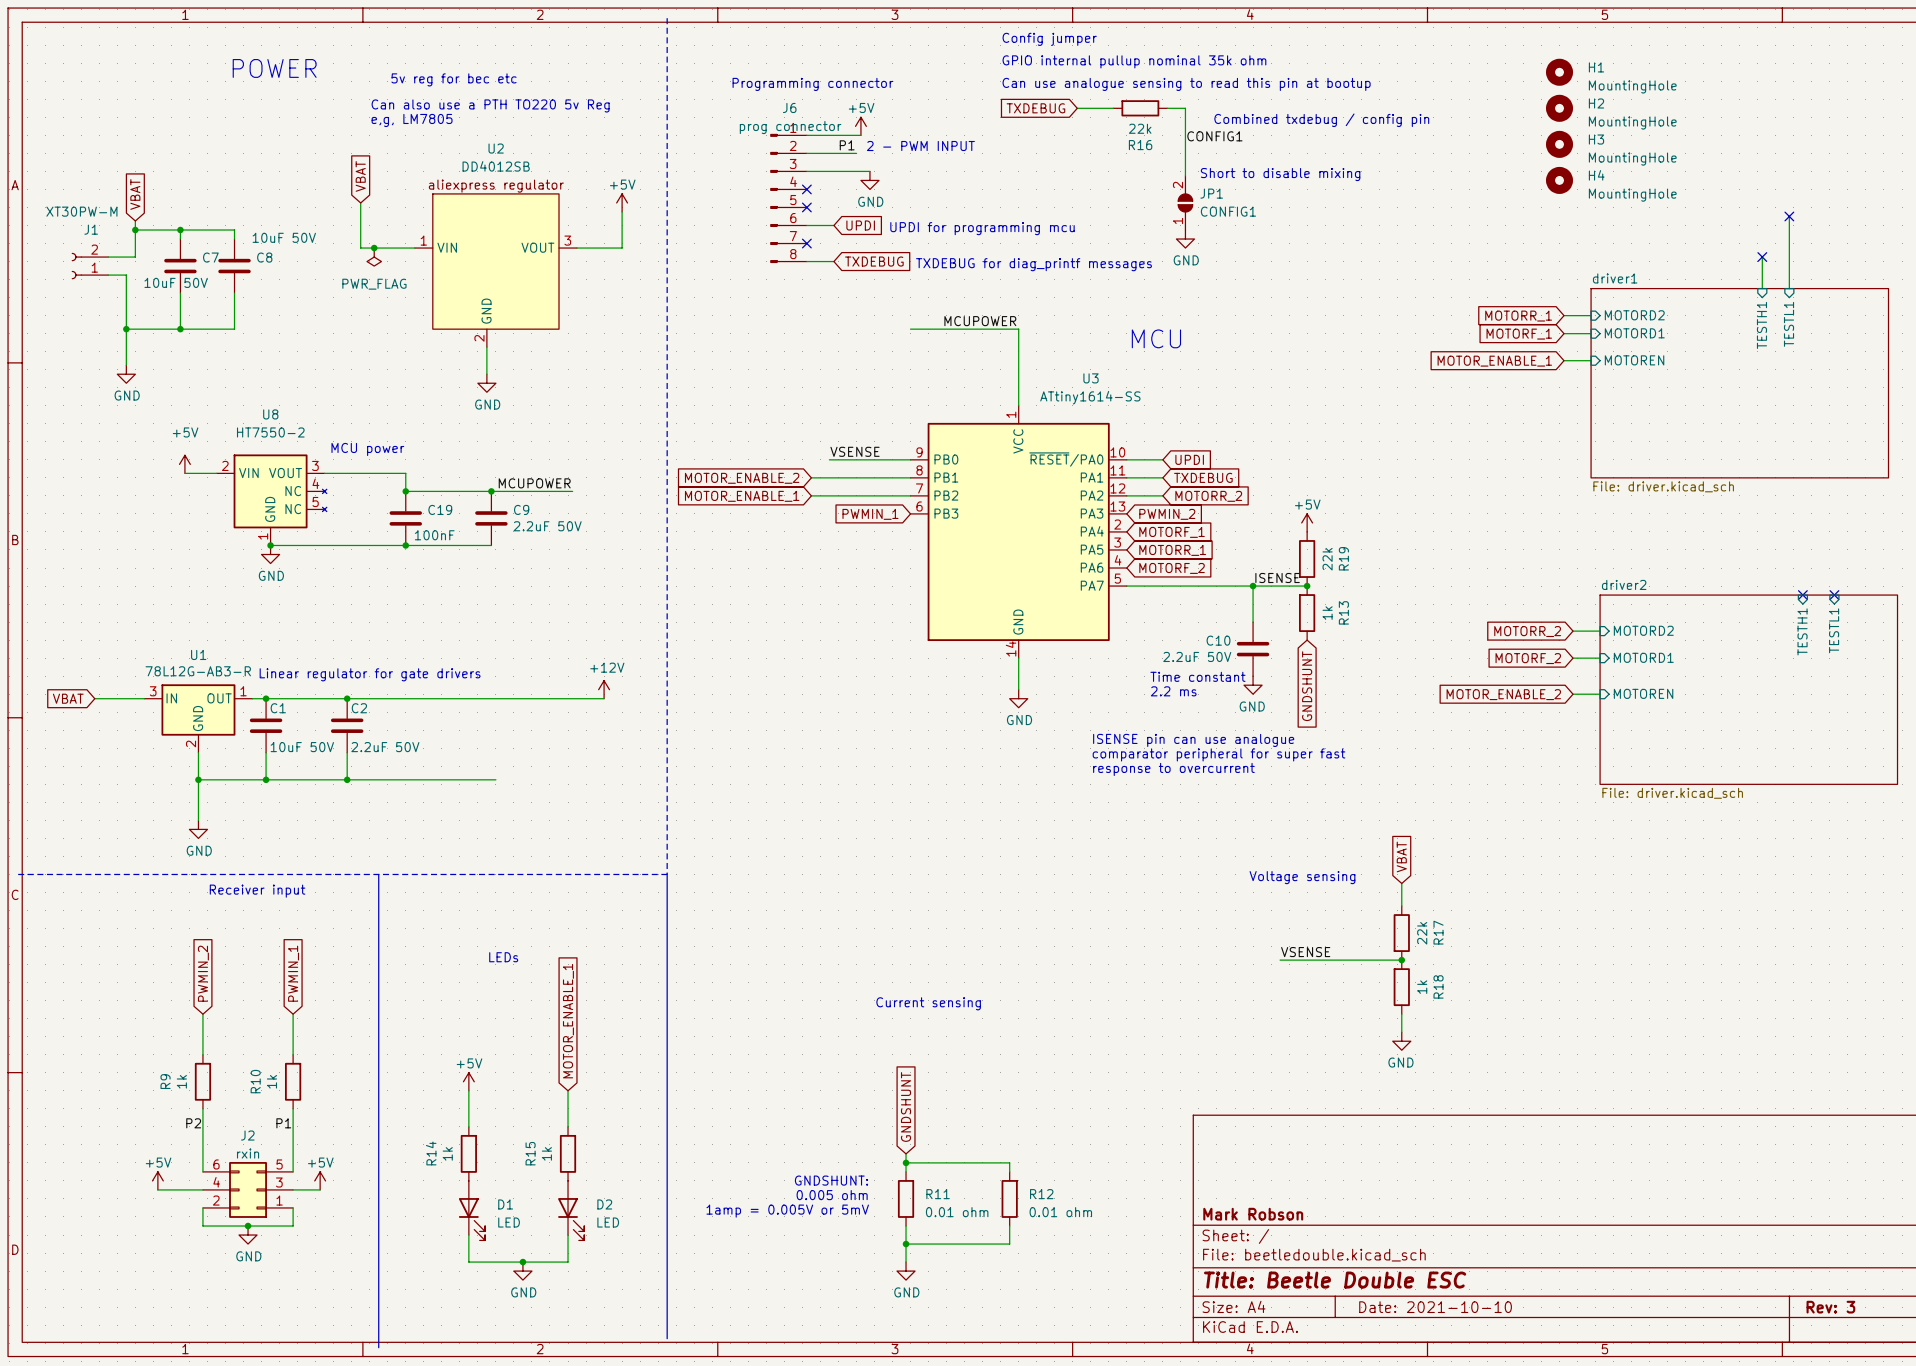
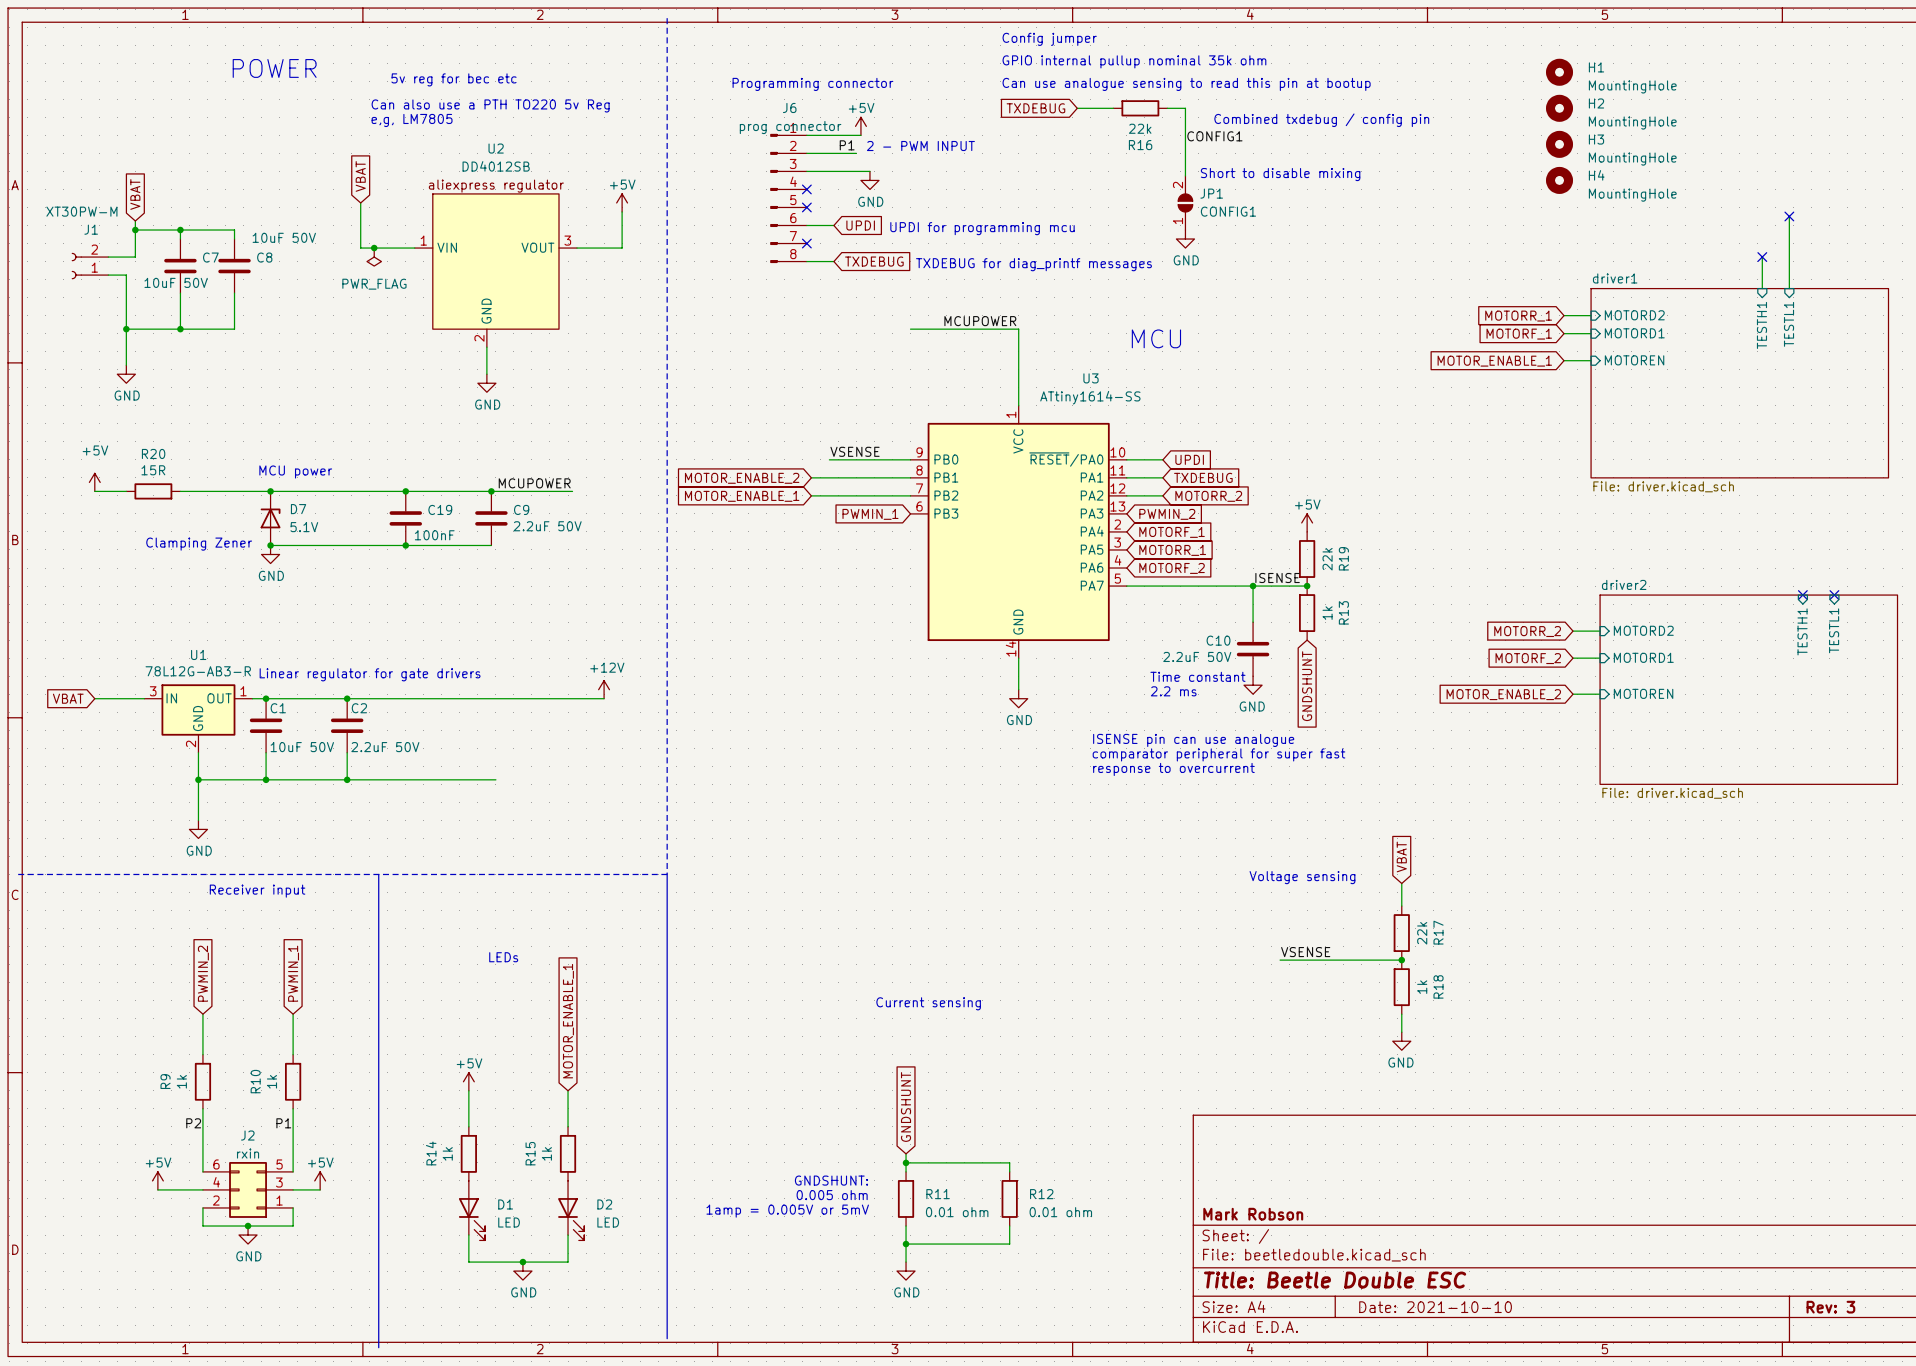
text position: MCU power (367, 449) -> MCU power (295, 471)
power symbol position: +5V (184, 464) -> +5V (94, 482)
wire: (184, 473) (216, 473) -> (94, 491) (126, 491)
wire: (324, 473) (405, 473) (405, 491) -> (180, 491) (405, 491)
R20: none -> 15R (153, 491)
junction: none -> (270, 491)
U8: HT7550-2 (271, 499) -> none
D7: none -> 5.1V (270, 518)
text: none -> Clamping Zener (199, 544)

